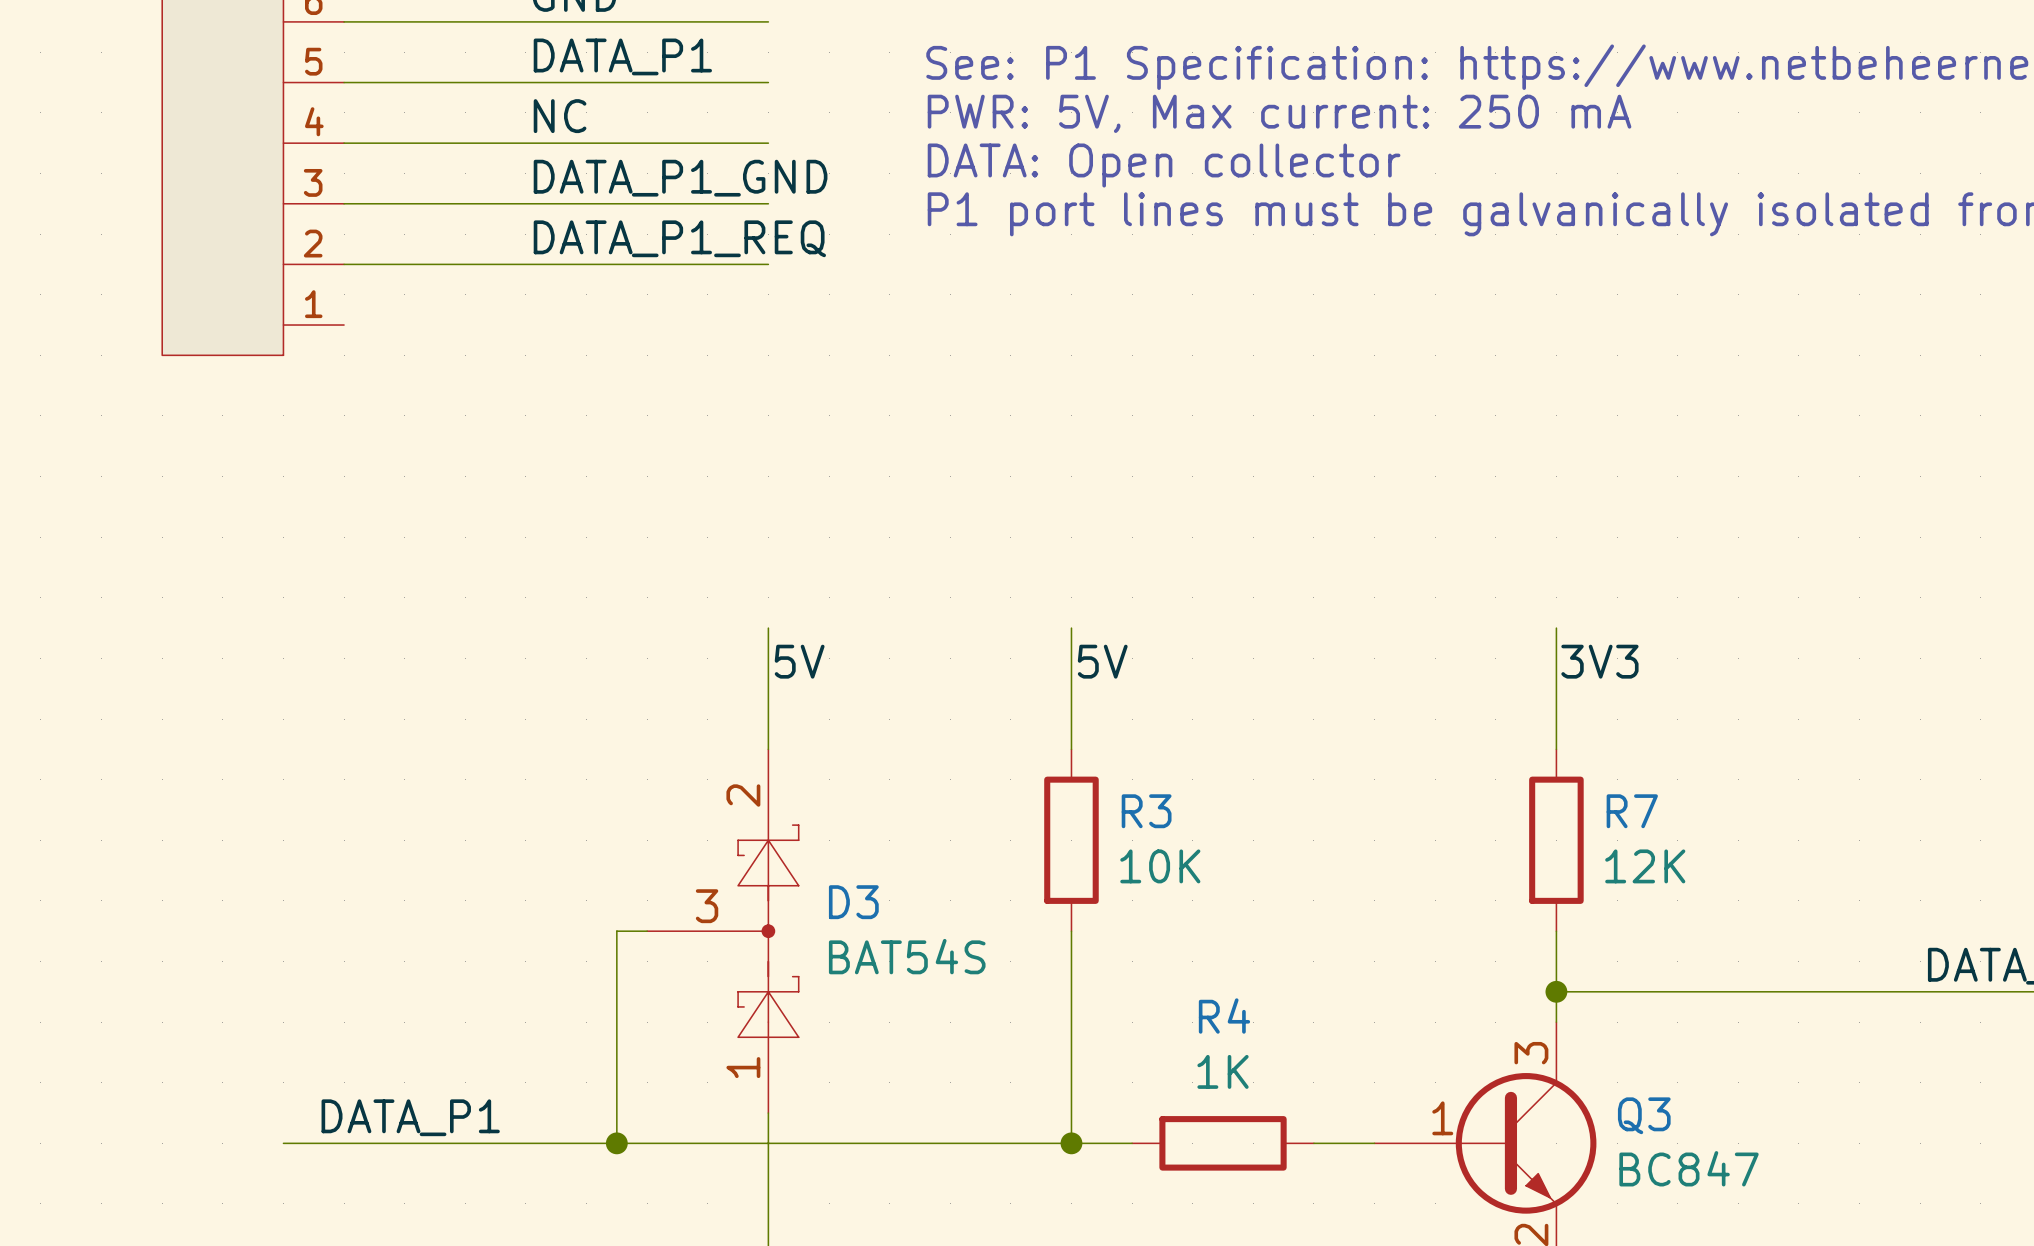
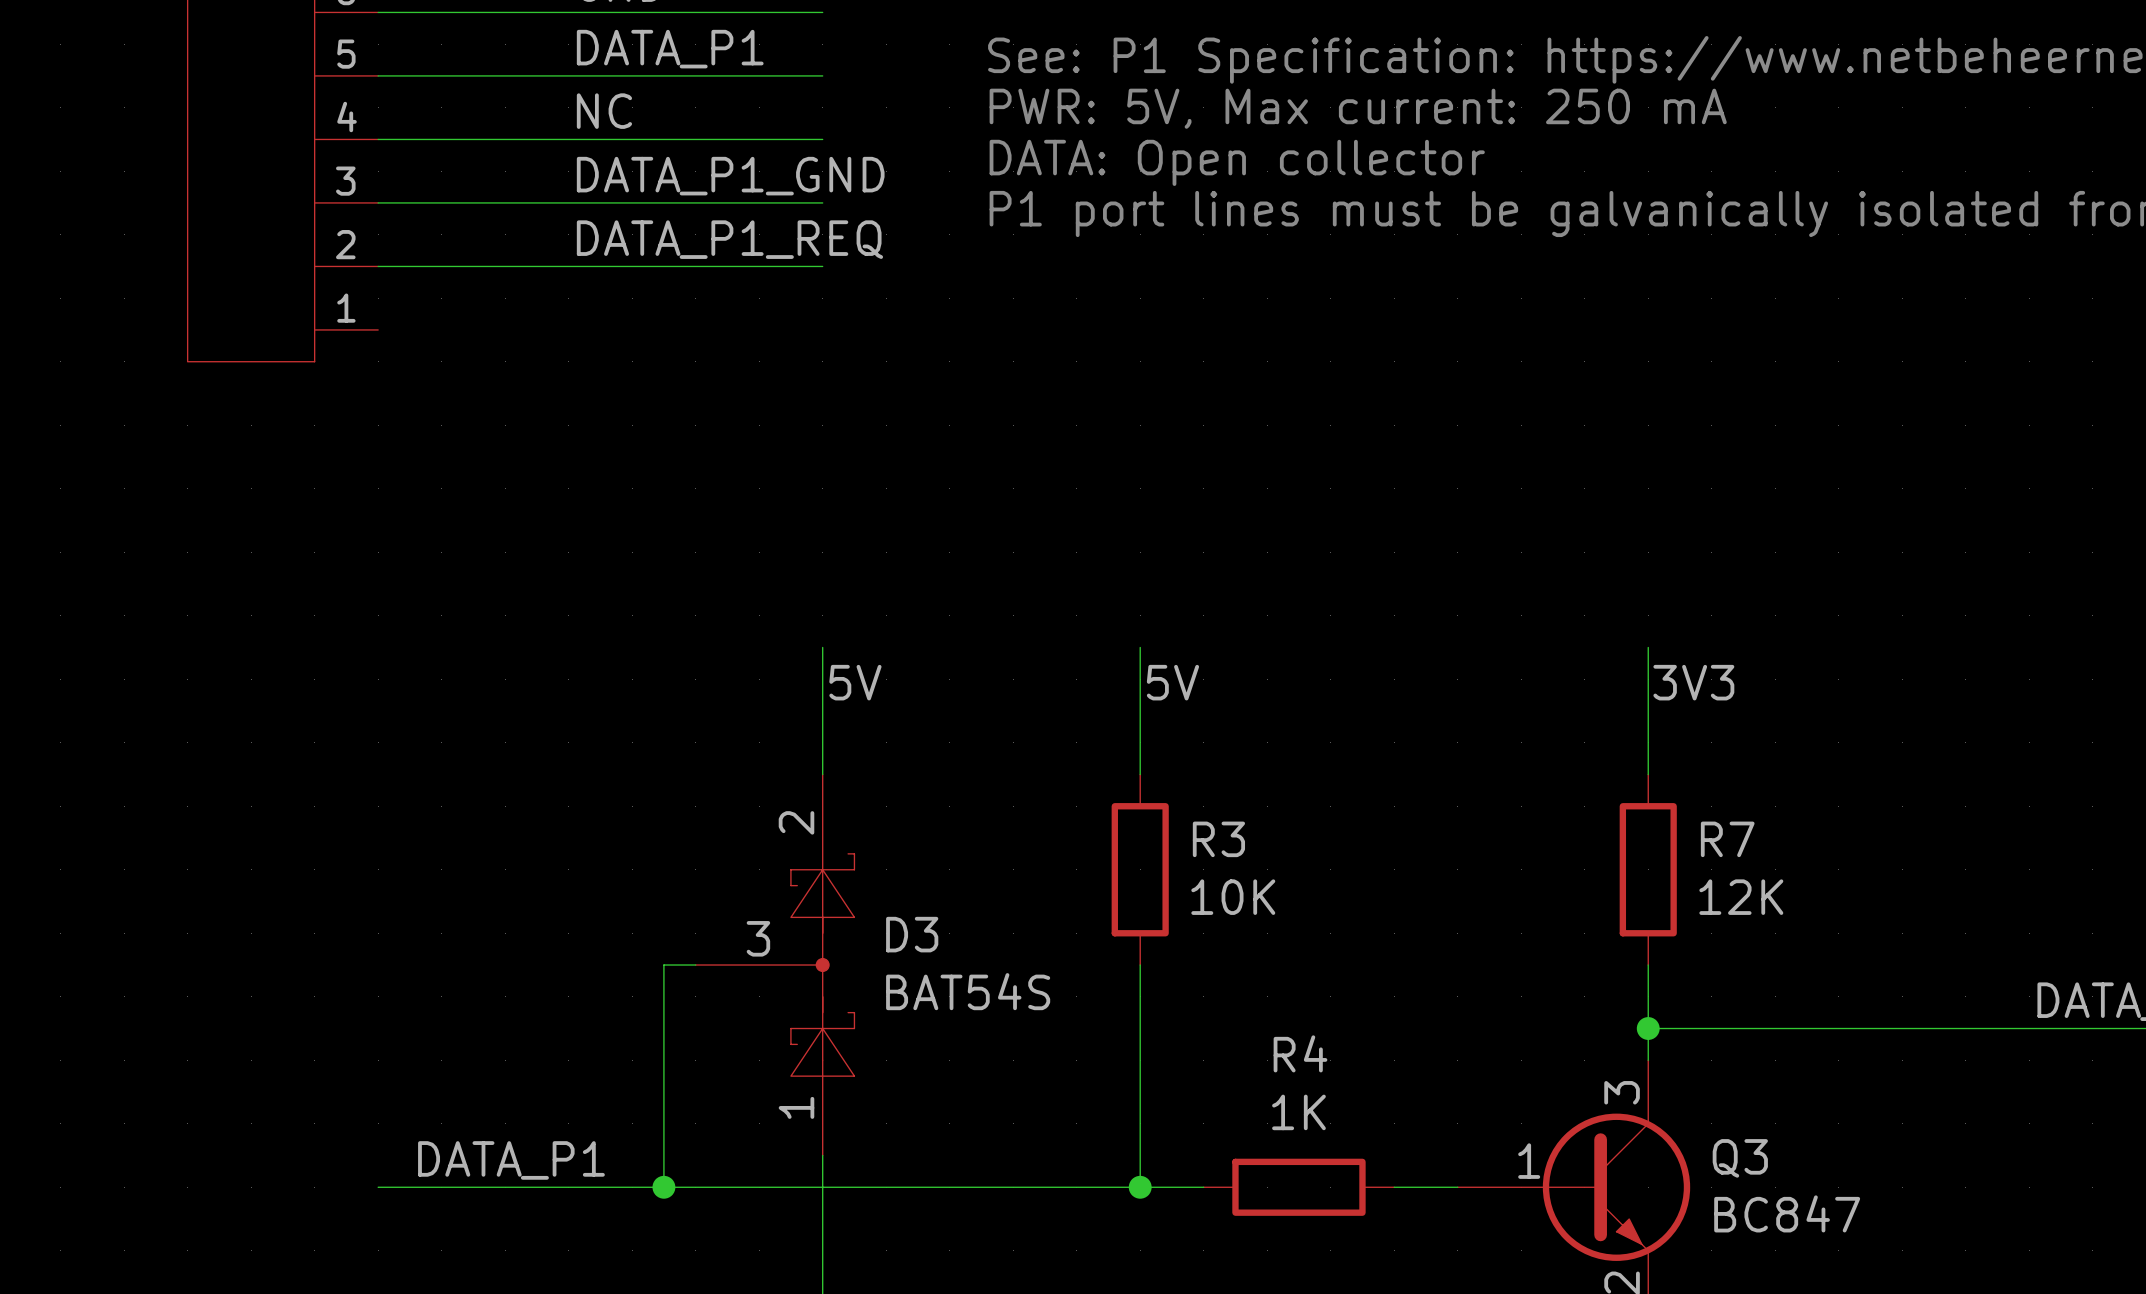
label position: DATA_P1 (410, 1117) -> DATA_P1 (511, 1160)
wire: (283, 1143) (344, 1143) -> none

